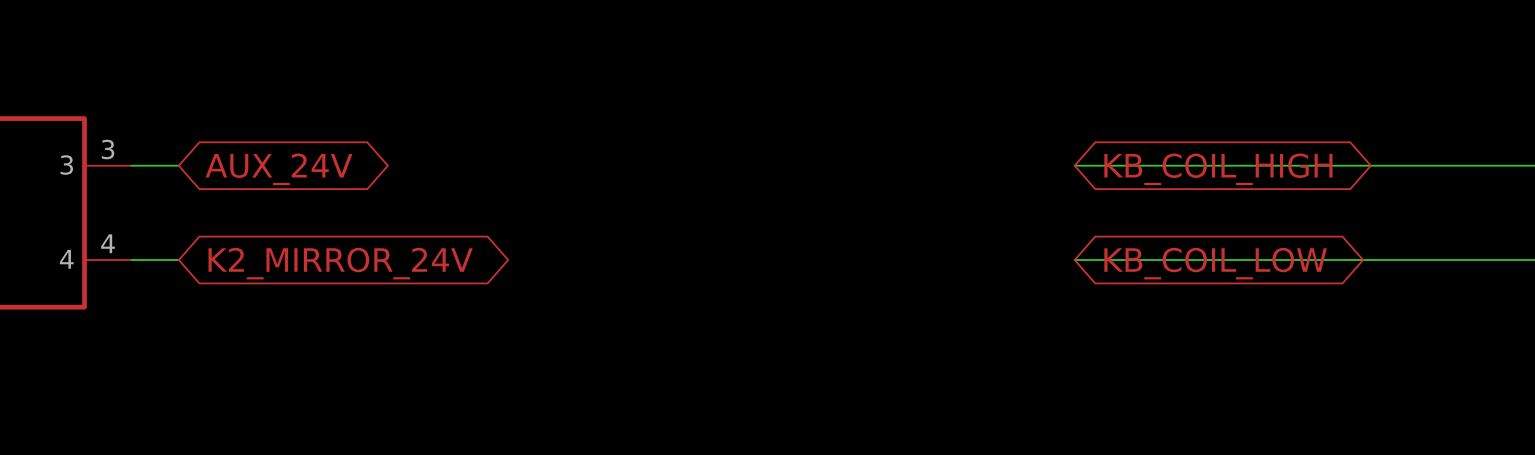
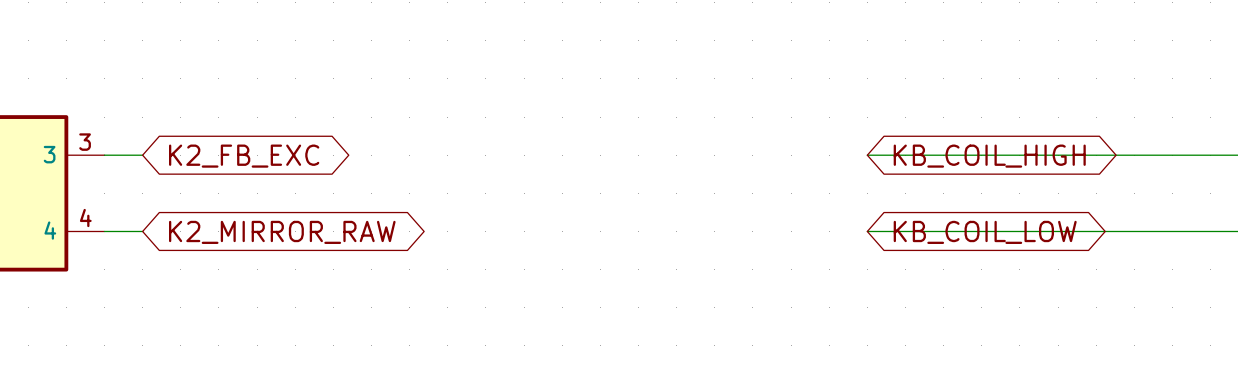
global label: AUX_24V (279, 169) -> K2_FB_EXC (244, 156)
global label: K2_MIRROR_24V (340, 263) -> K2_MIRROR_RAW (282, 232)

